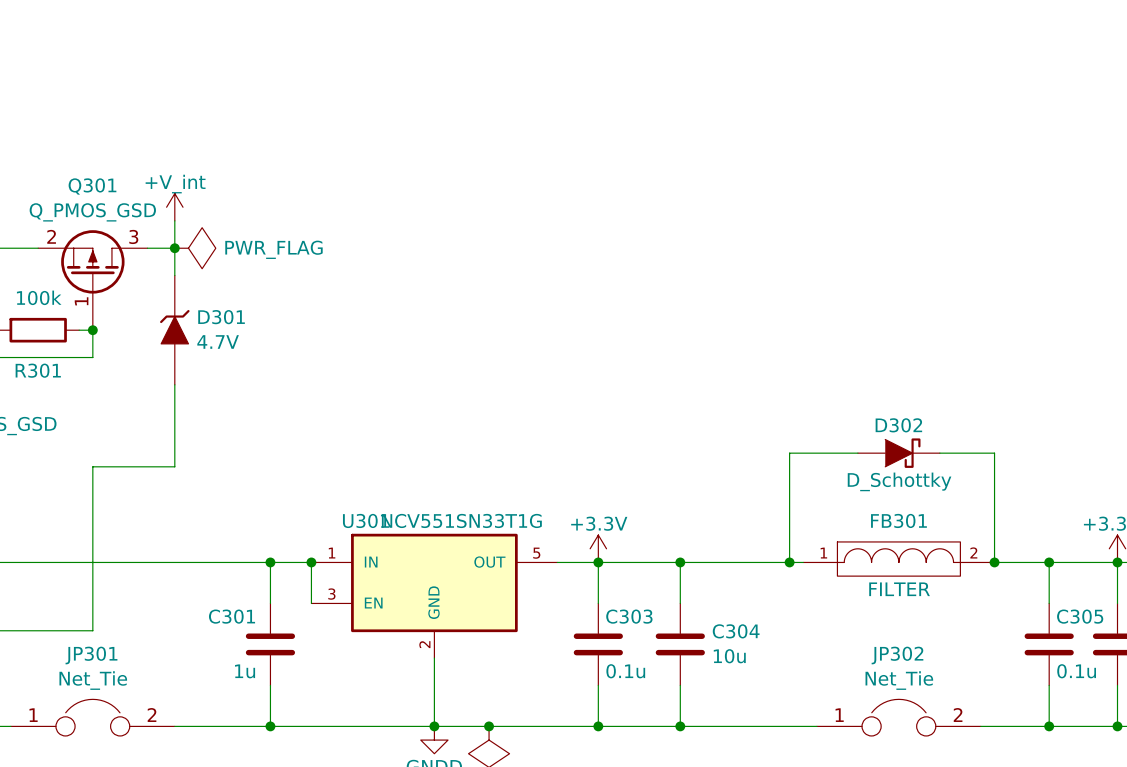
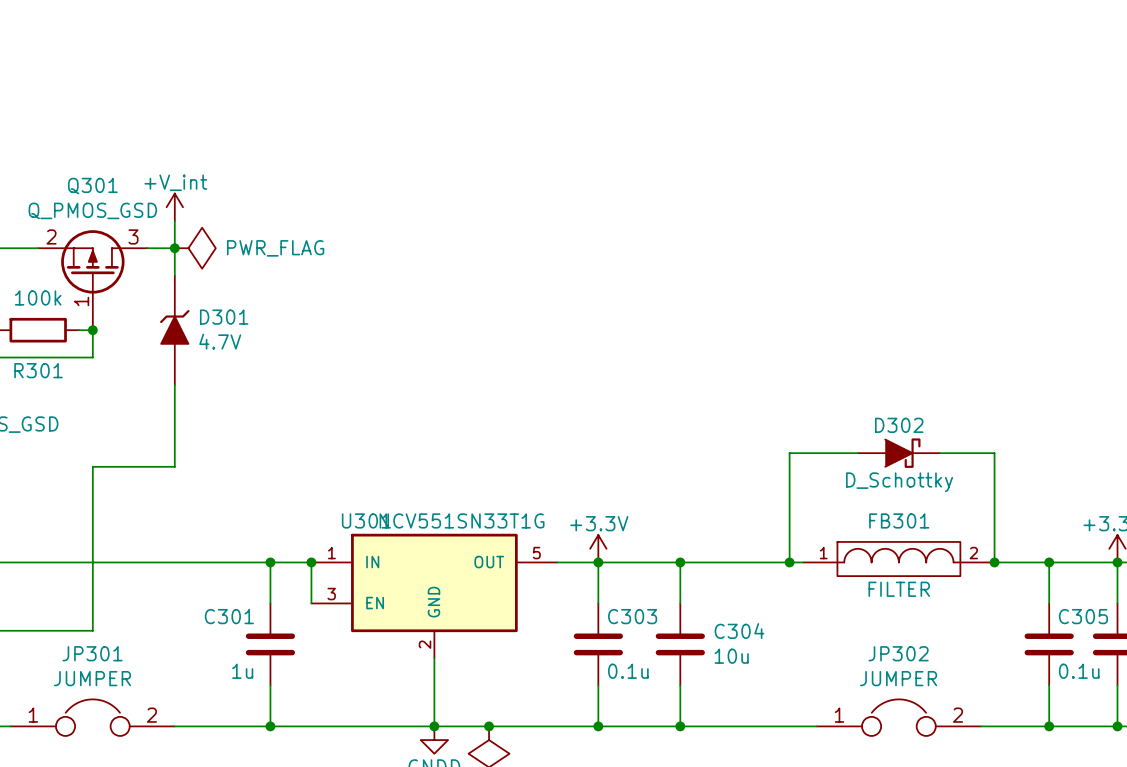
JP301 value: Net_Tie (93, 680) -> JUMPER (92, 678)
JP302 value: Net_Tie (899, 680) -> JUMPER (898, 678)

